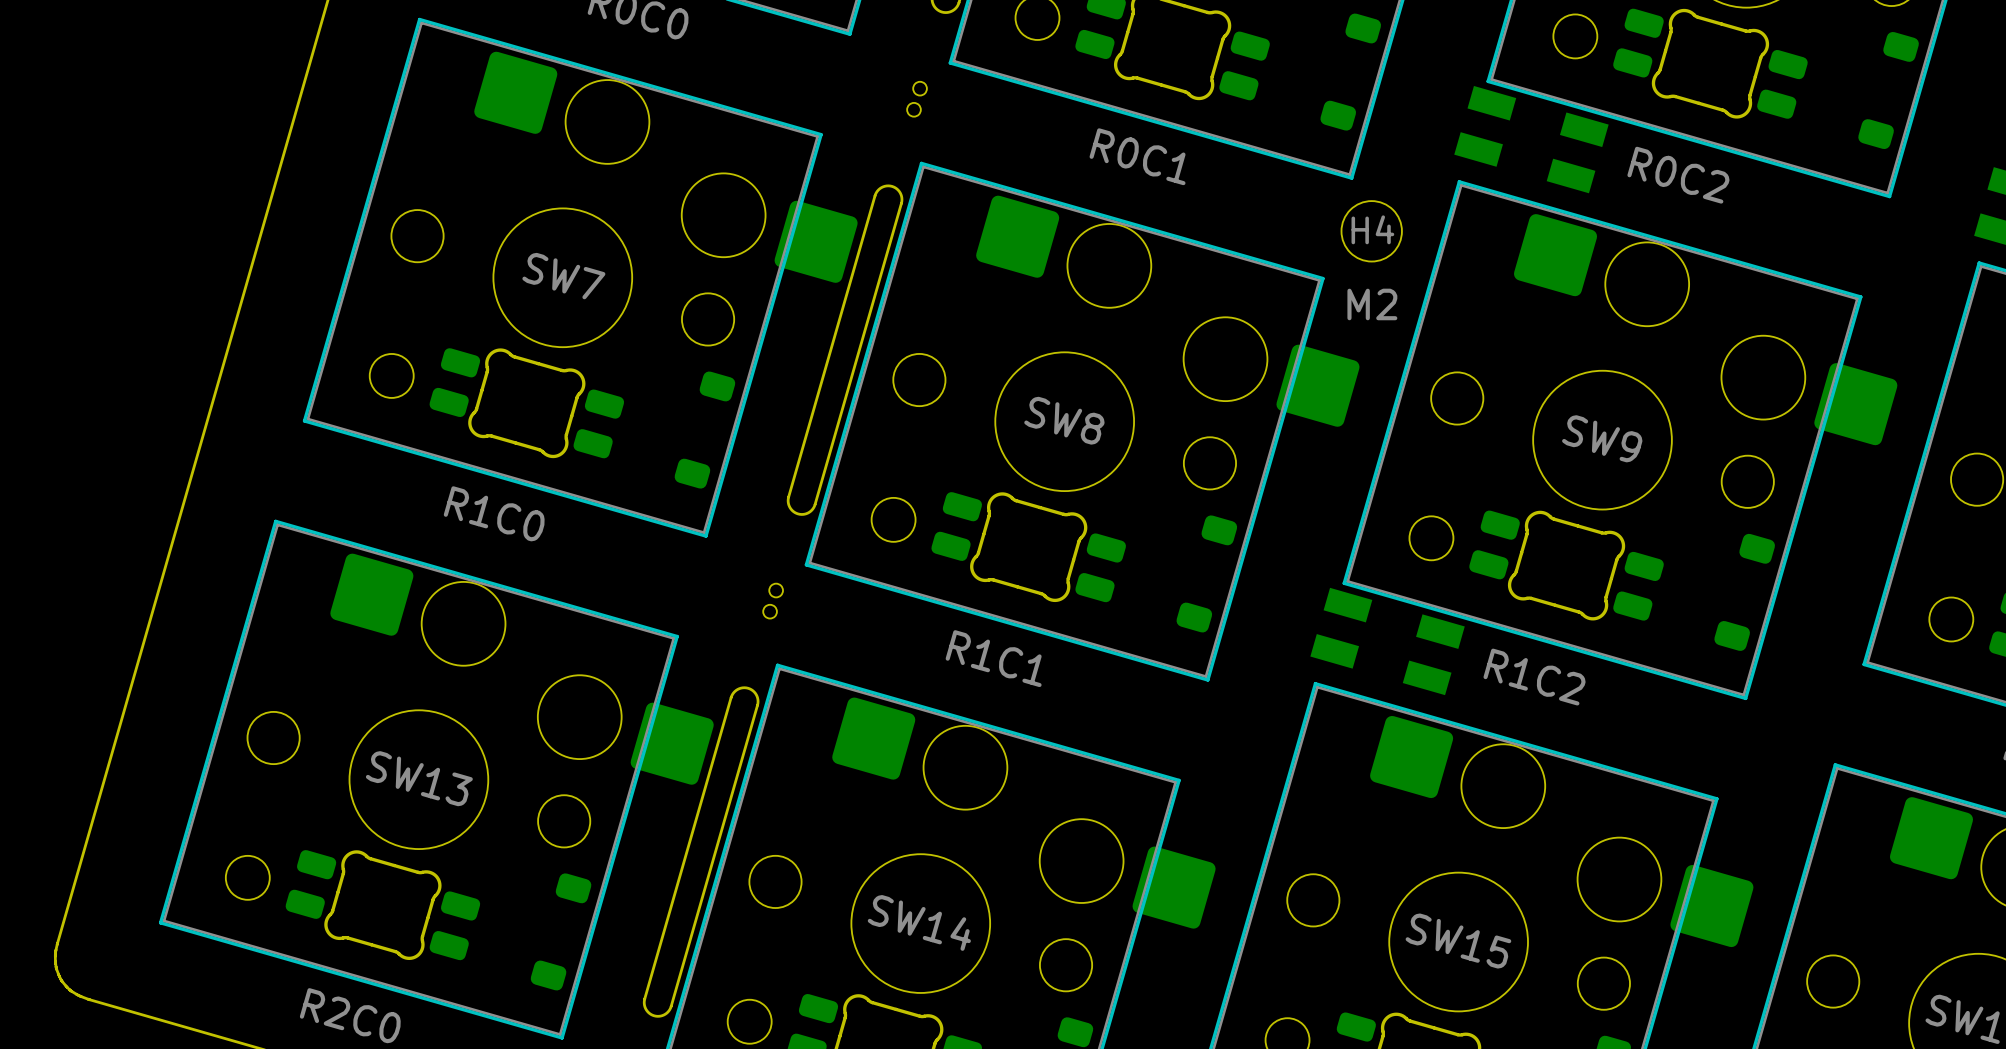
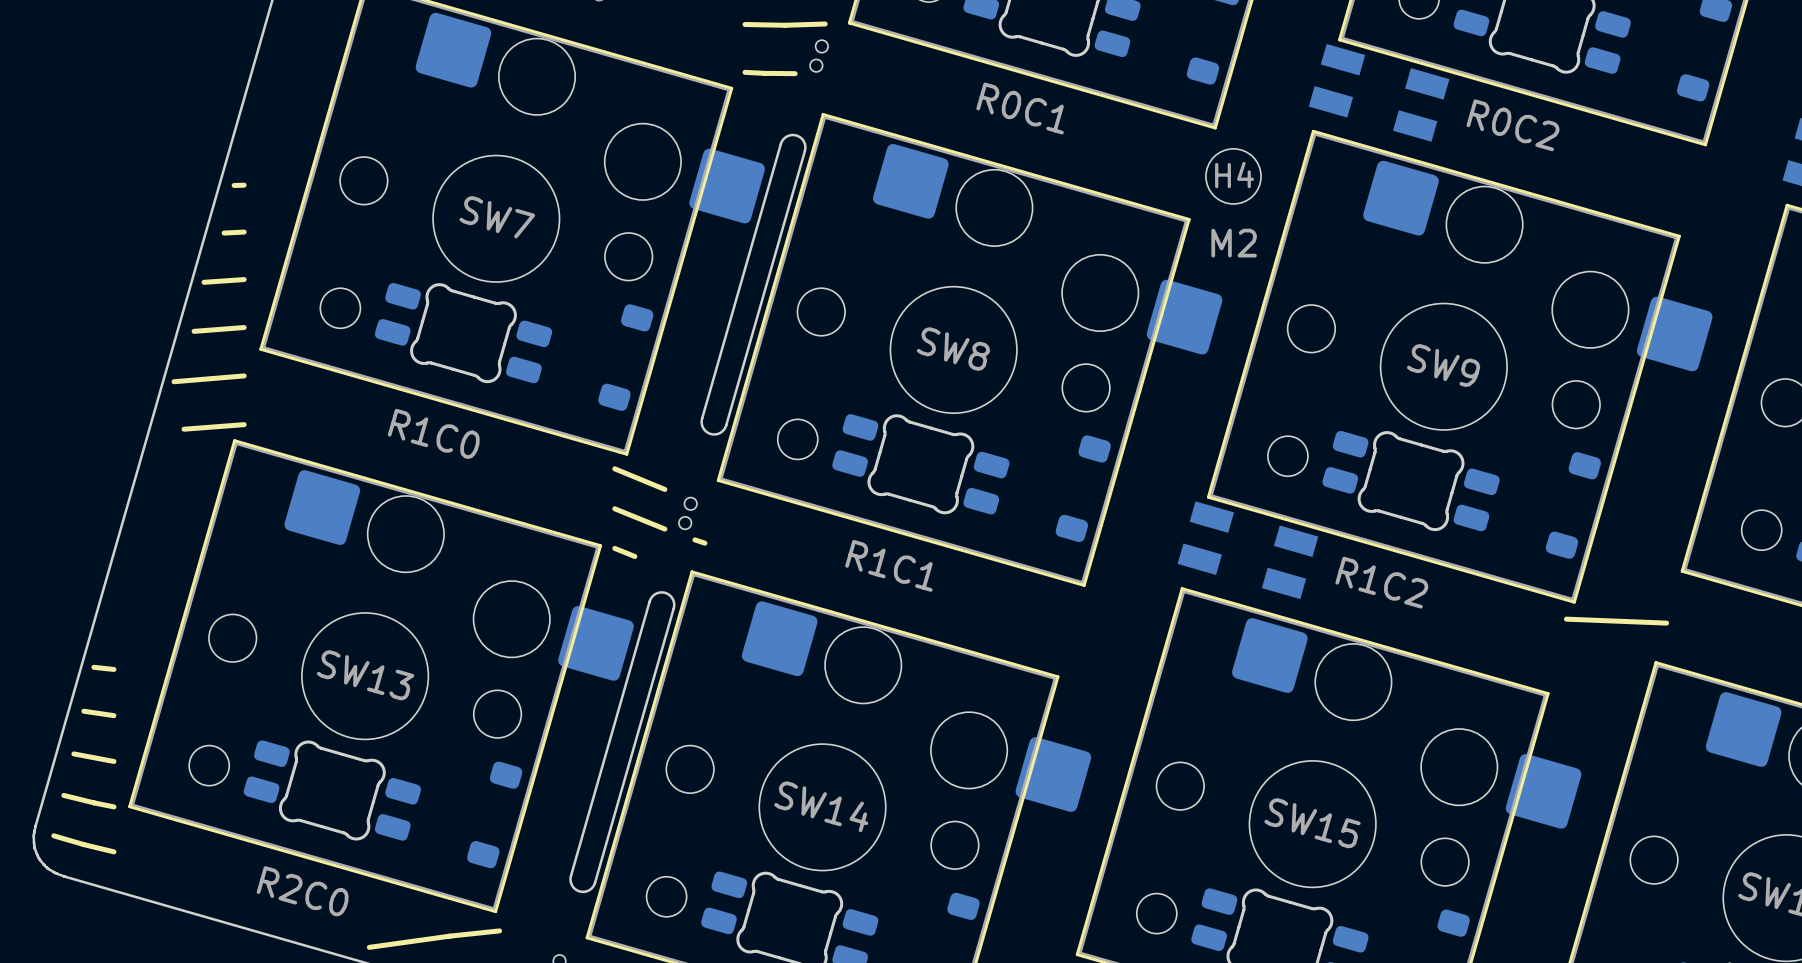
line: none -> (825, 24) (745, 24)
line: none -> (745, 72) (795, 73)
line: none -> (244, 185) (234, 185)
line: none -> (244, 232) (224, 233)
line: none -> (244, 279) (204, 282)
line: none -> (244, 327) (194, 331)
line: none -> (244, 375) (174, 381)
line: none -> (244, 424) (184, 429)
line: none -> (614, 468) (664, 489)
line: none -> (614, 508) (664, 529)
line: none -> (694, 539) (704, 543)
line: none -> (614, 548) (634, 556)
line: none -> (1566, 619) (1666, 623)
line: none -> (93, 667) (113, 669)
line: none -> (83, 711) (113, 715)
line: none -> (73, 753) (113, 761)
line: none -> (63, 795) (113, 806)
line: none -> (53, 835) (113, 851)

